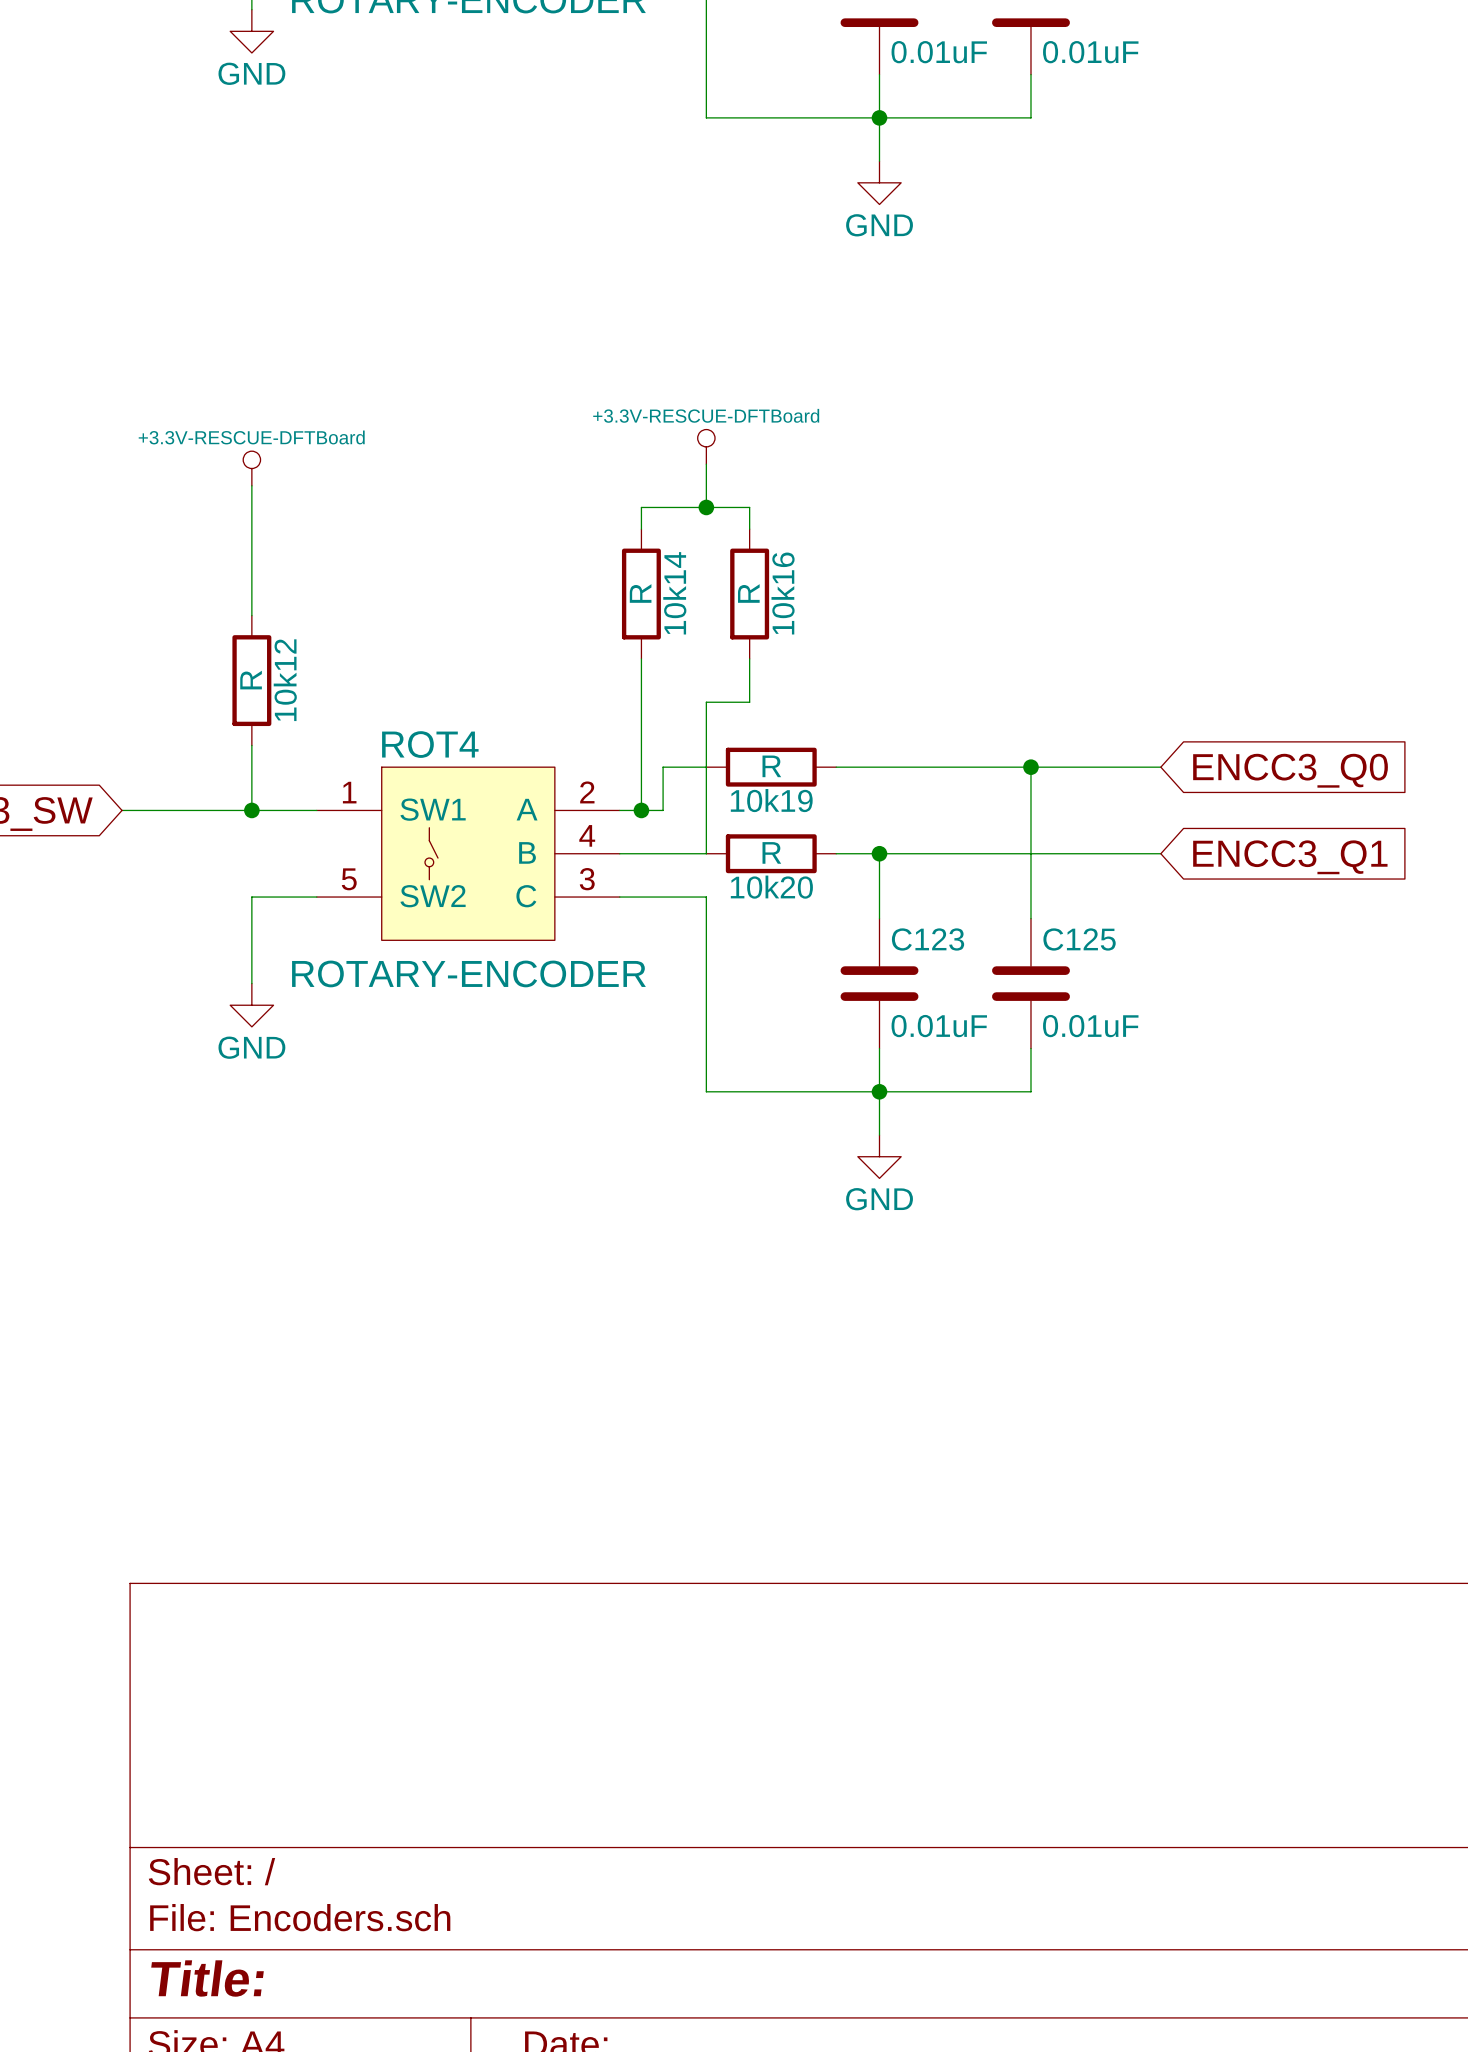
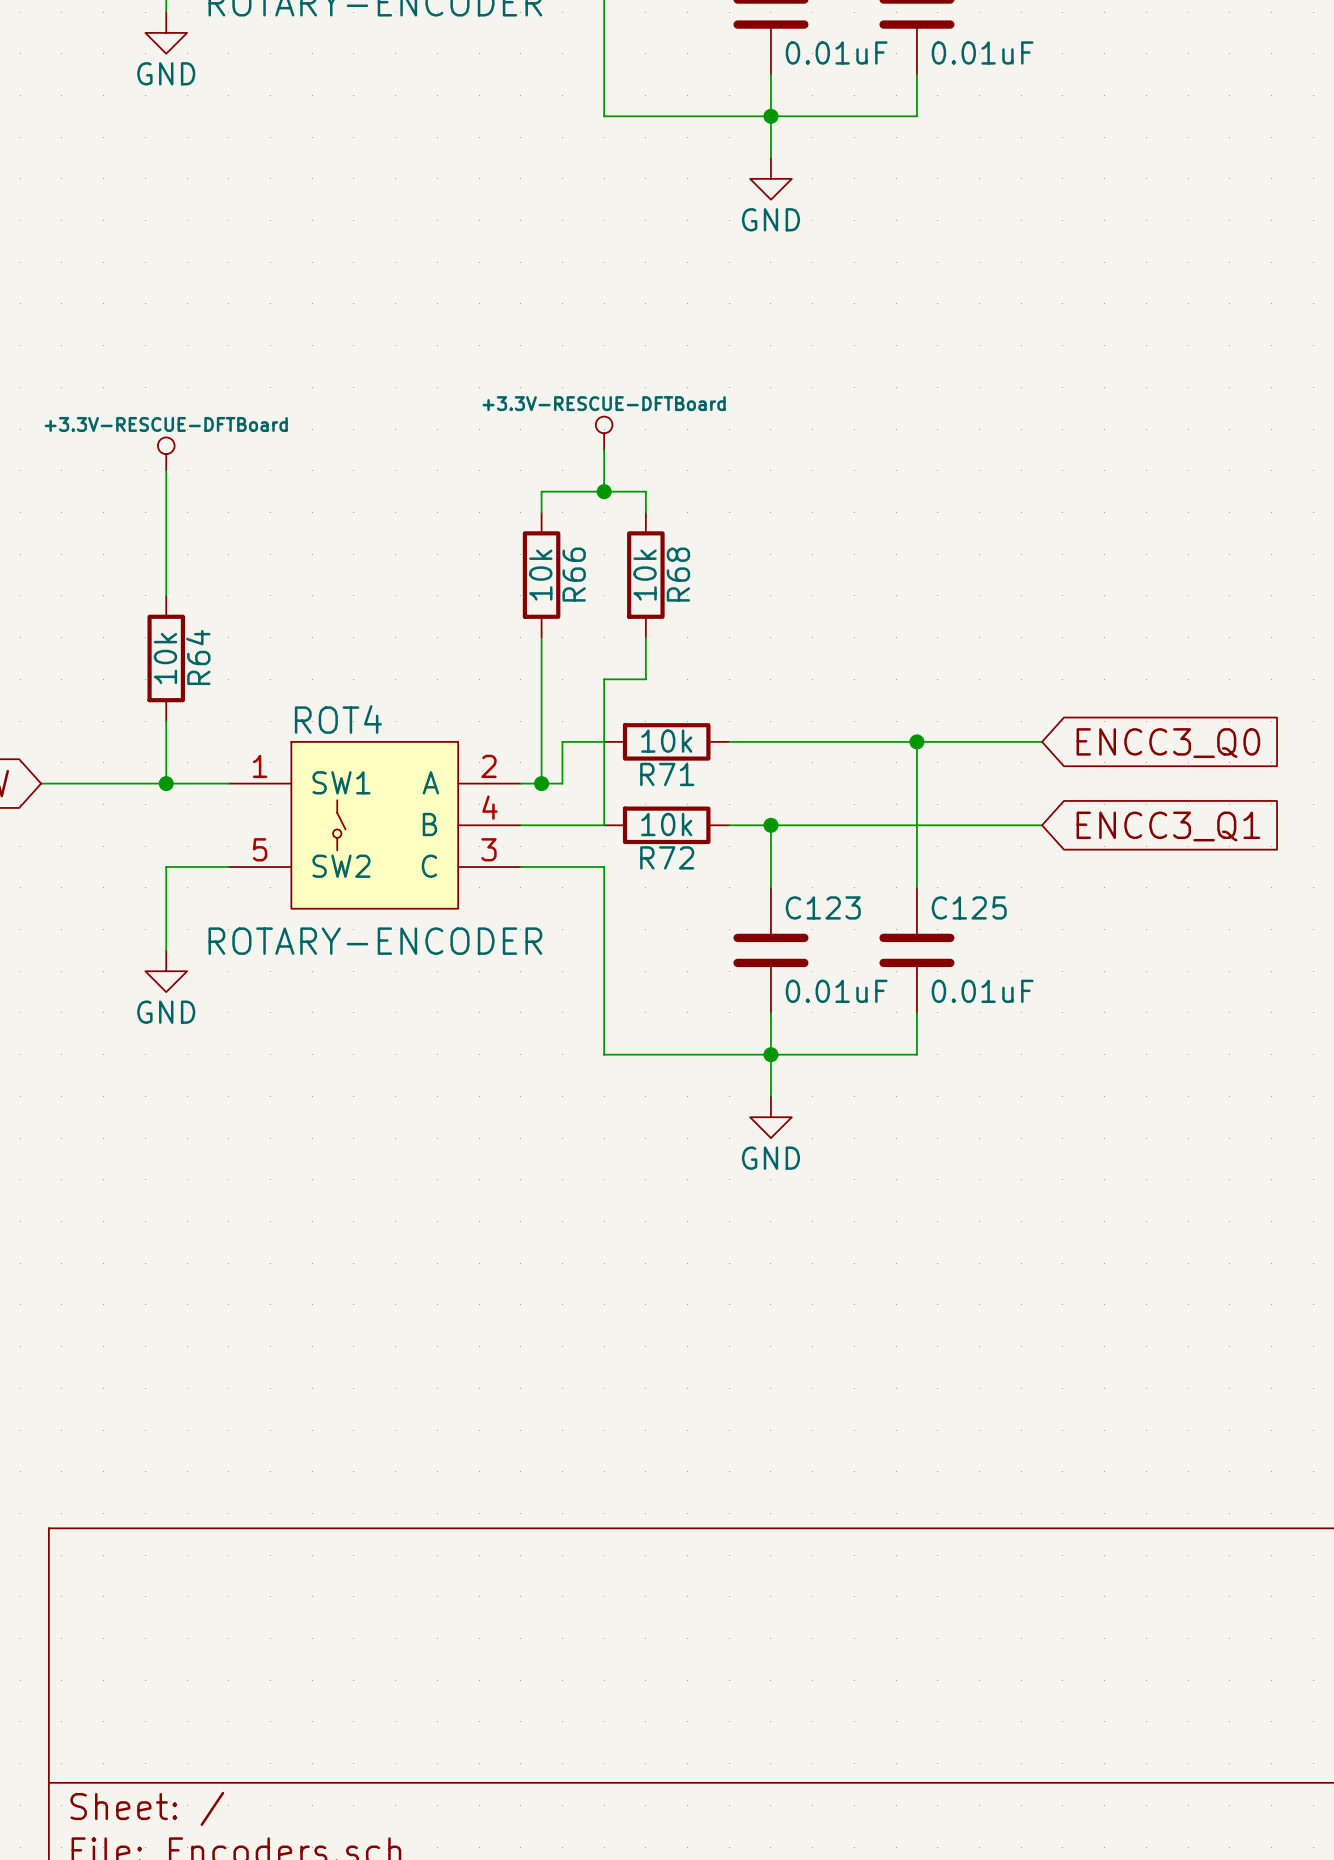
10k14 value: R (640, 593) -> 10k (540, 575)
10k14 name: 10k14 (674, 593) -> R66 (574, 574)
10k16 value: R (748, 593) -> 10k (645, 575)
10k16 name: 10k16 (783, 593) -> R68 (678, 574)
10k12 value: R (251, 680) -> 10k (165, 658)
10k12 name: 10k12 (285, 680) -> R64 (198, 657)
10k19 value: R (771, 766) -> 10k (666, 741)
10k19 name: 10k19 (771, 800) -> R71 (667, 774)
10k20 value: R (771, 852) -> 10k (666, 824)
10k20 name: 10k20 (771, 887) -> R72 (667, 857)

